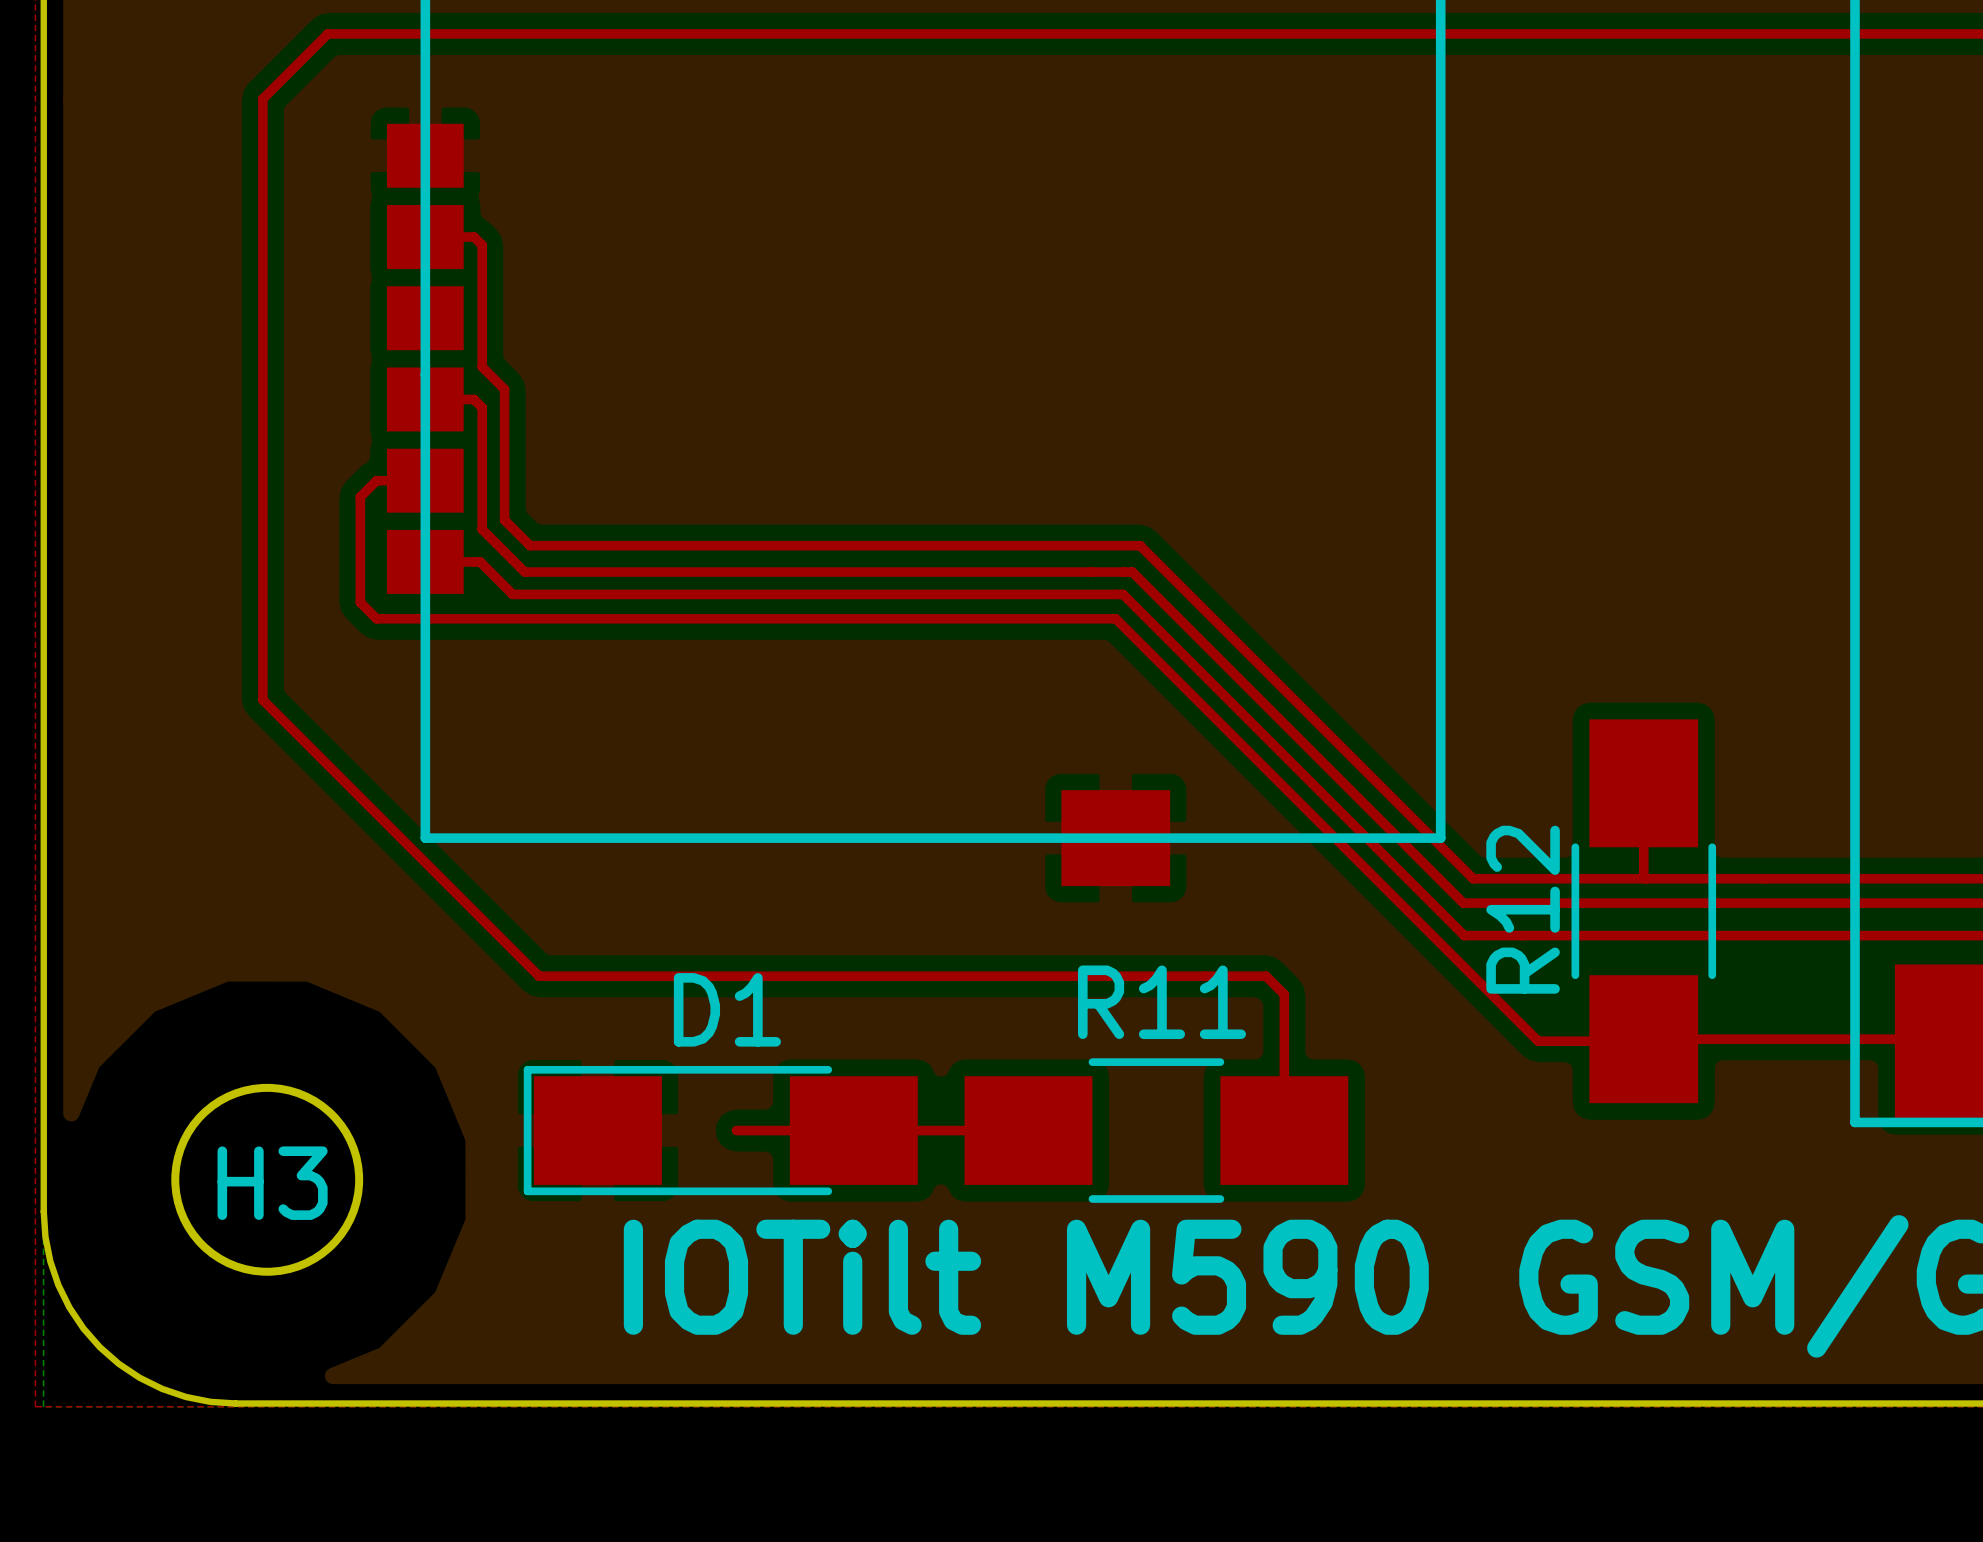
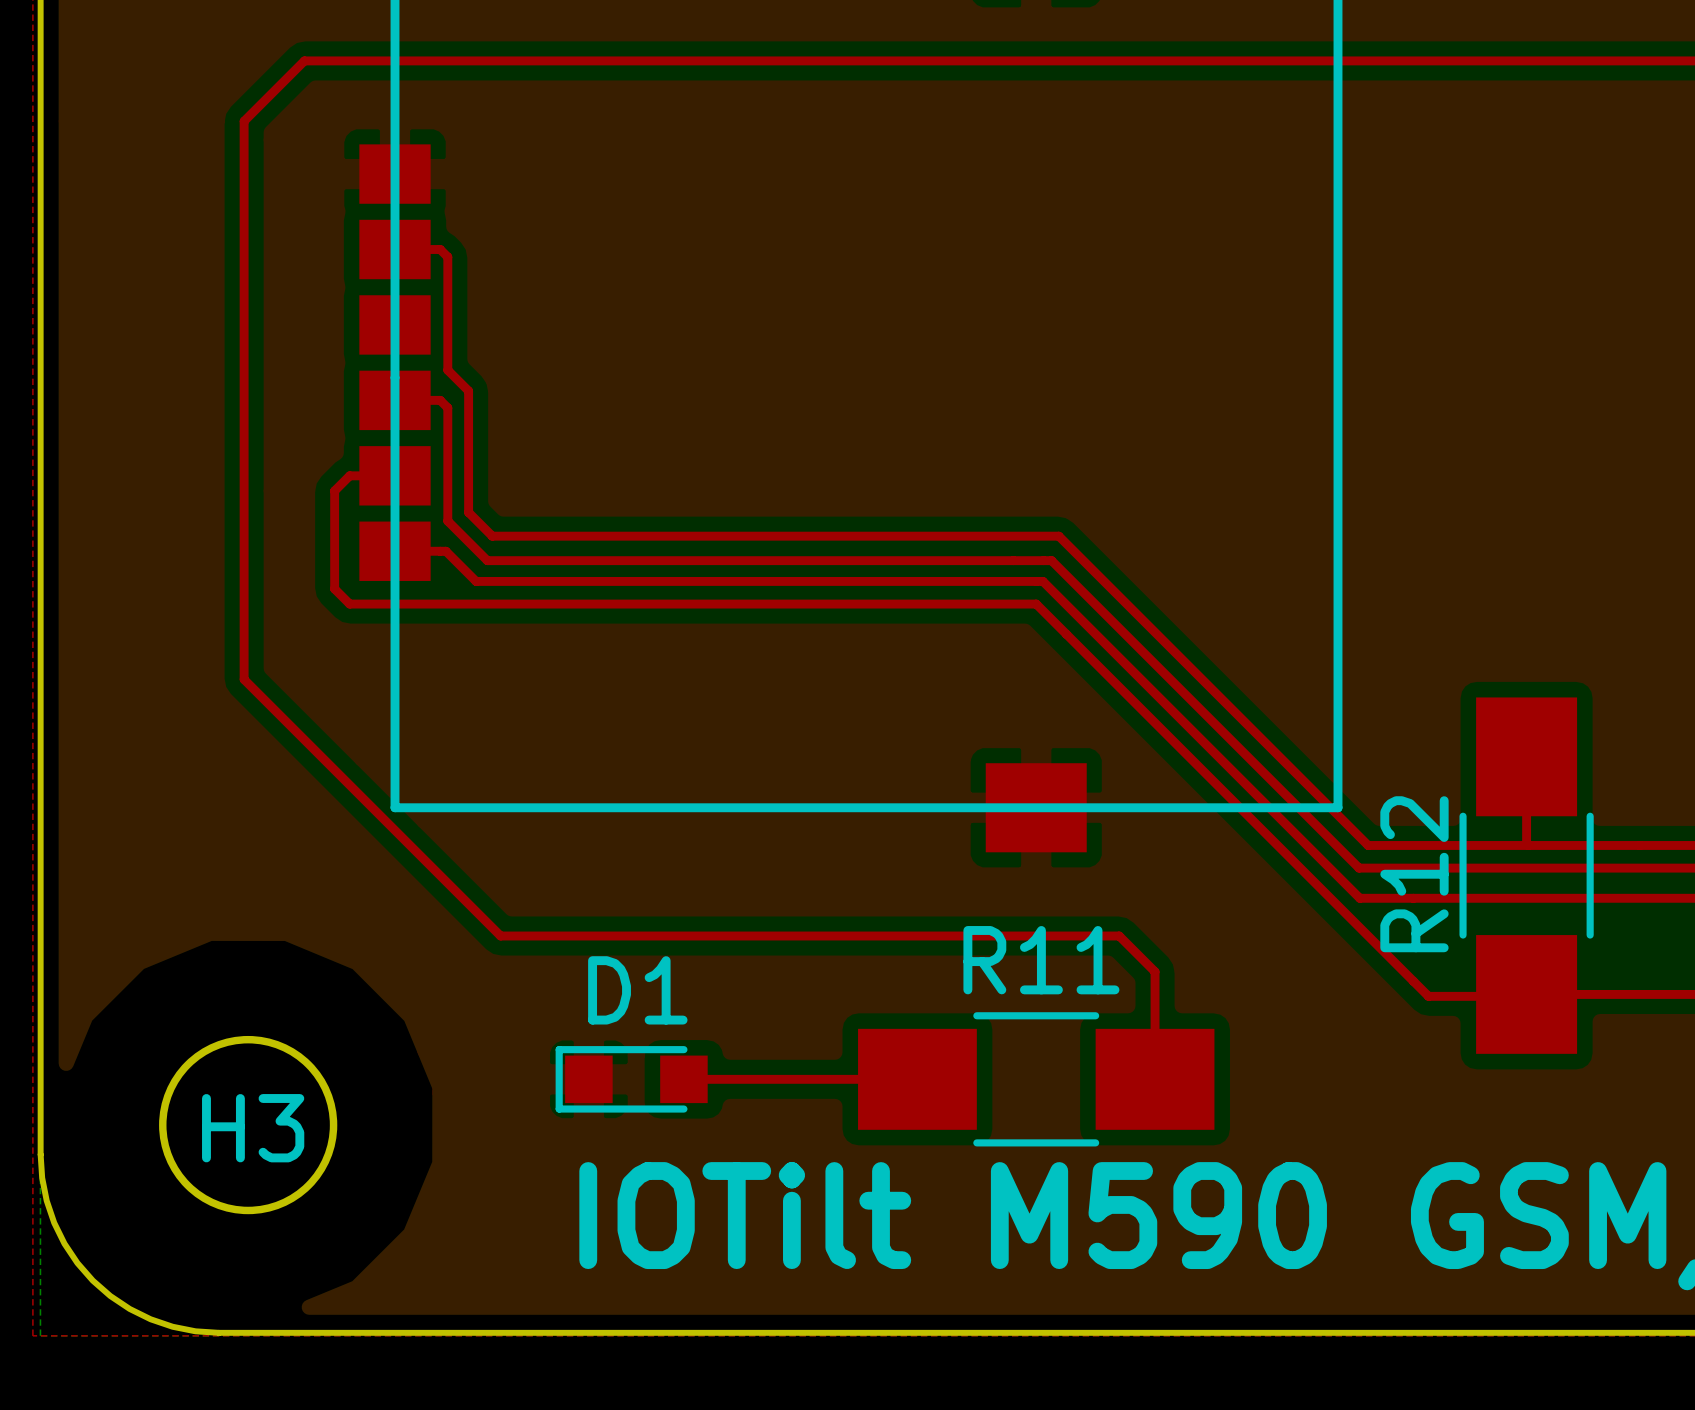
top track: (1205, 976) (1266, 976) (1284, 994) (1284, 1130) -> (1119, 936) (1155, 971) (1155, 1079)
D1 footprint: [523, 1065, 918, 1196] -> [555, 1046, 708, 1113]
R11 position: (1156, 1130) -> (1036, 1079)

